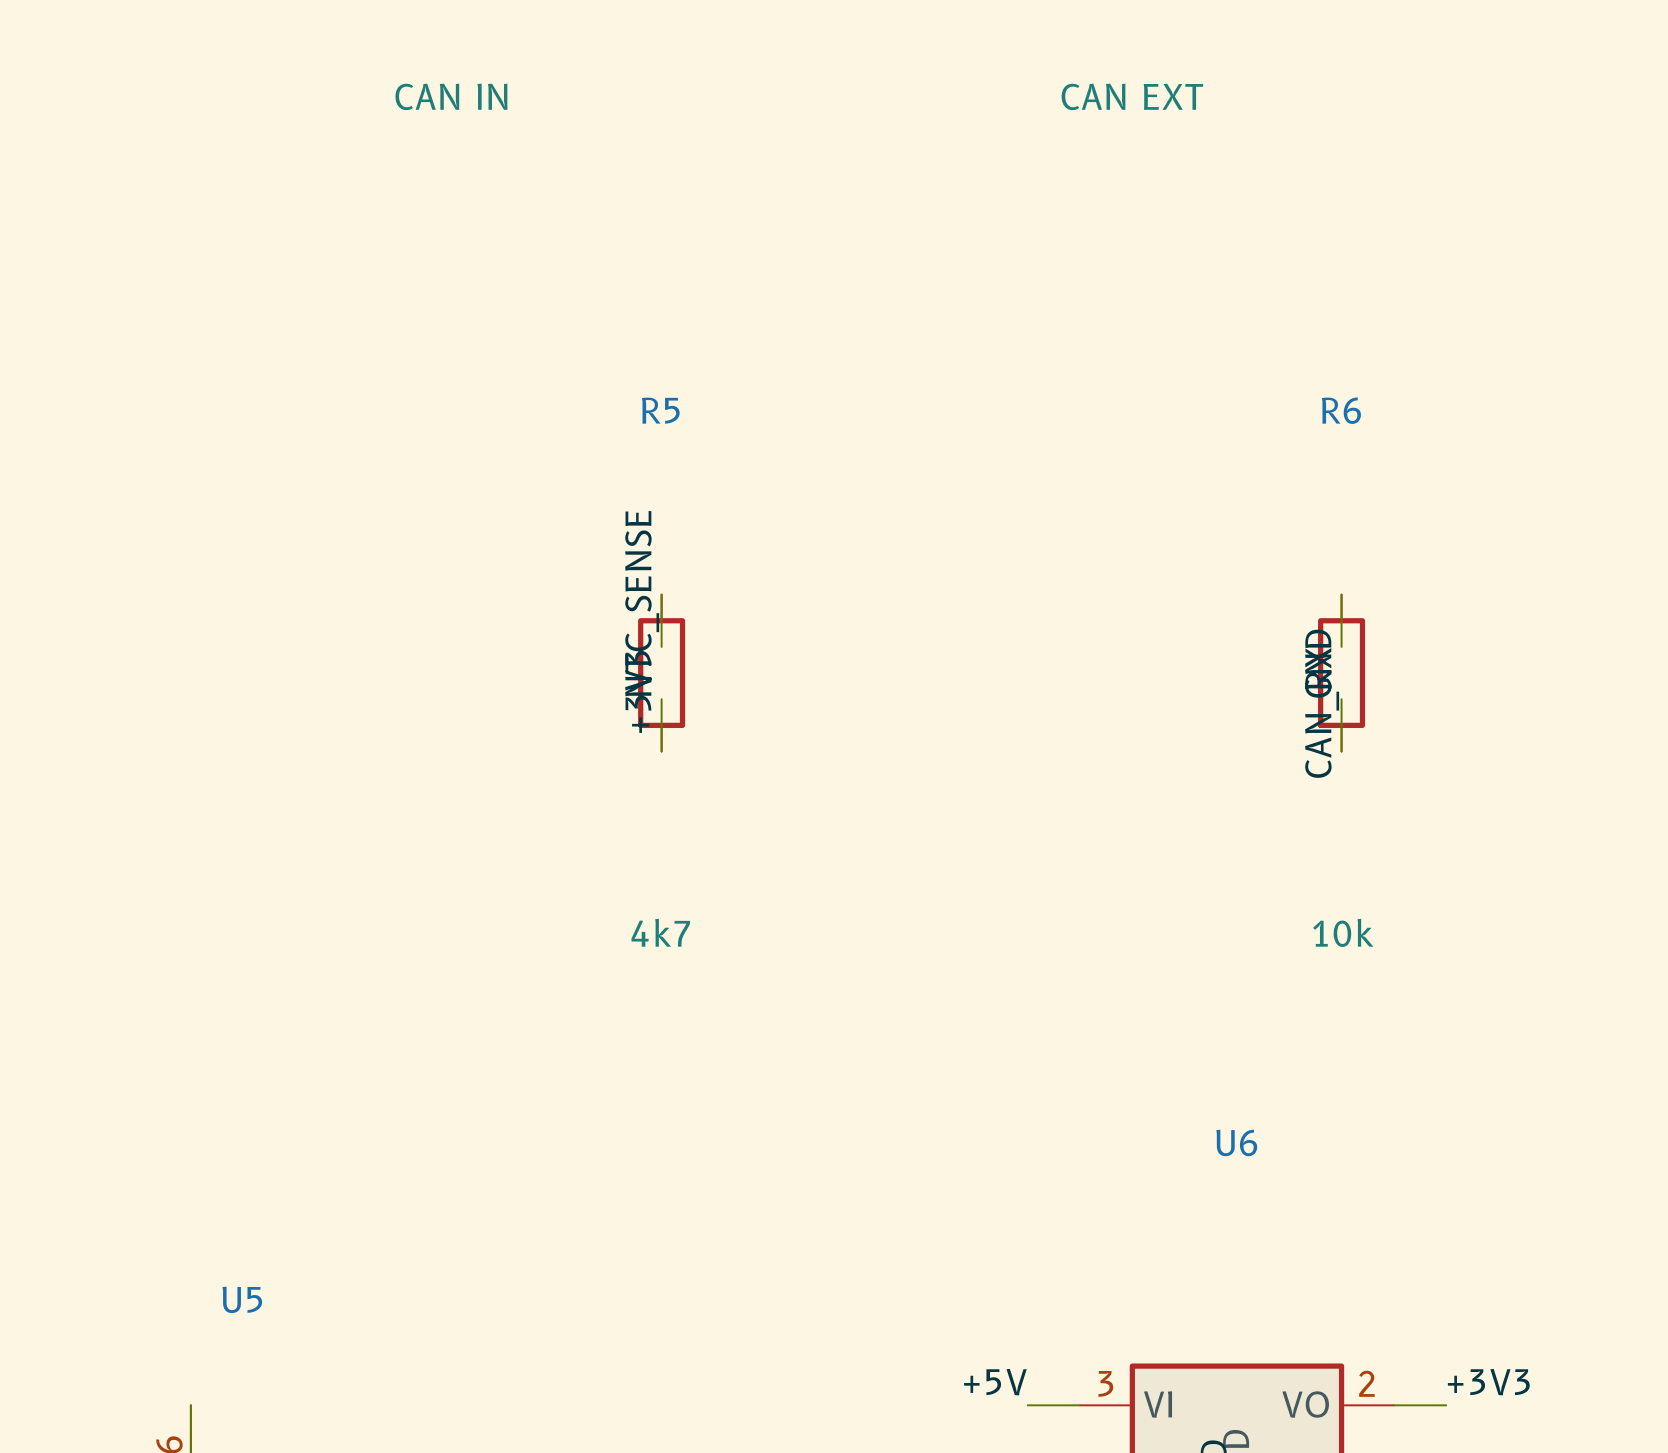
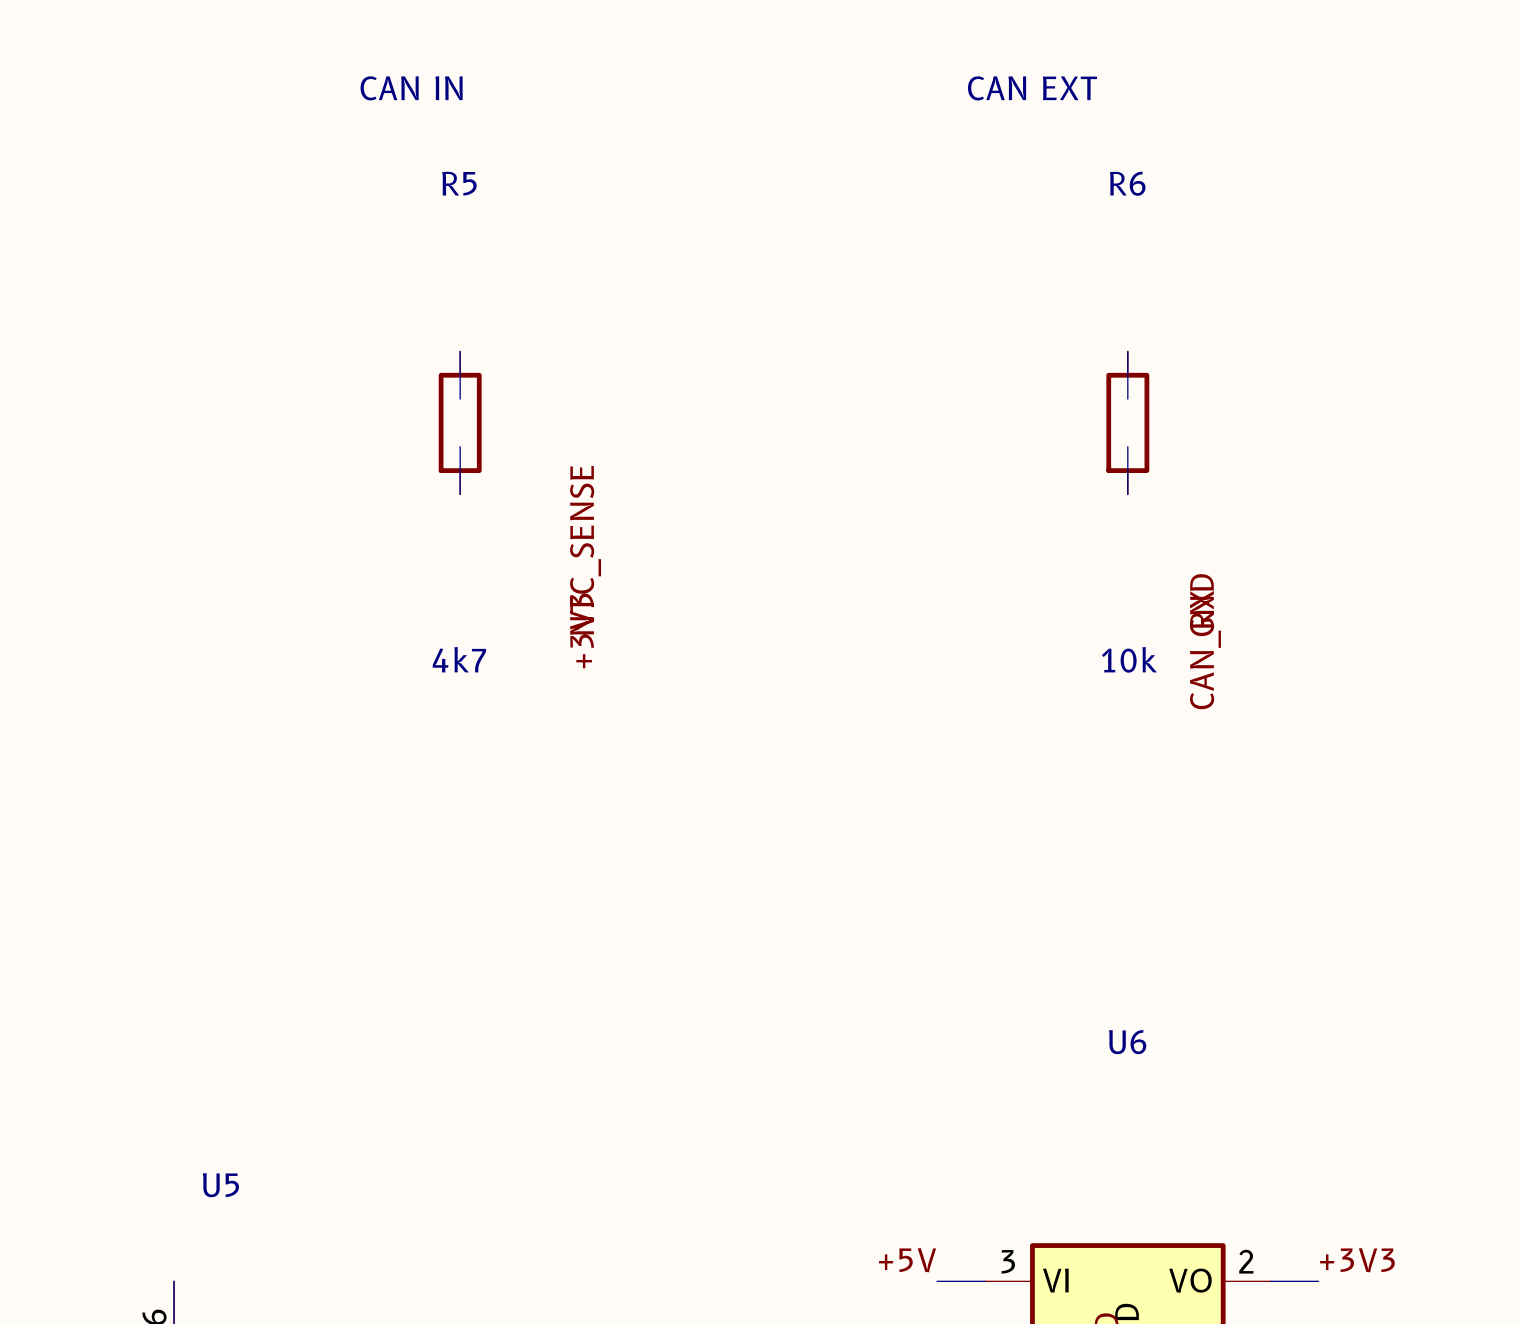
wire: (661, 594) (661, 646) -> (460, 351) (460, 399)
wire: (1341, 594) (1341, 646) -> (1127, 351) (1127, 399)
R5 position: (661, 673) -> (460, 422)
R6 position: (1341, 673) -> (1127, 422)
wire: (661, 699) (661, 751) -> (460, 446) (460, 494)
wire: (1341, 699) (1341, 751) -> (1127, 446) (1127, 494)

